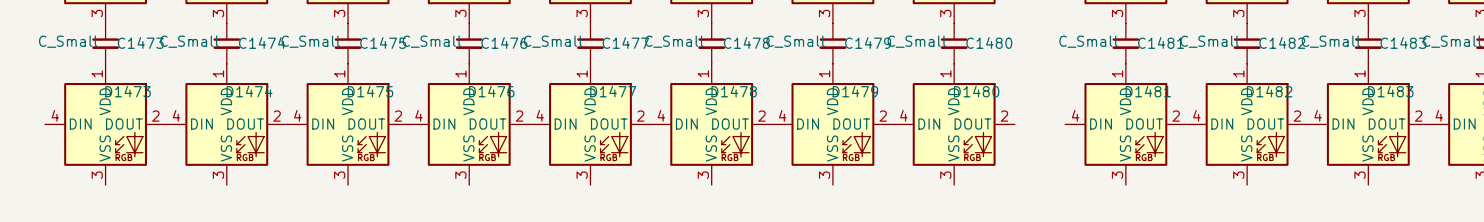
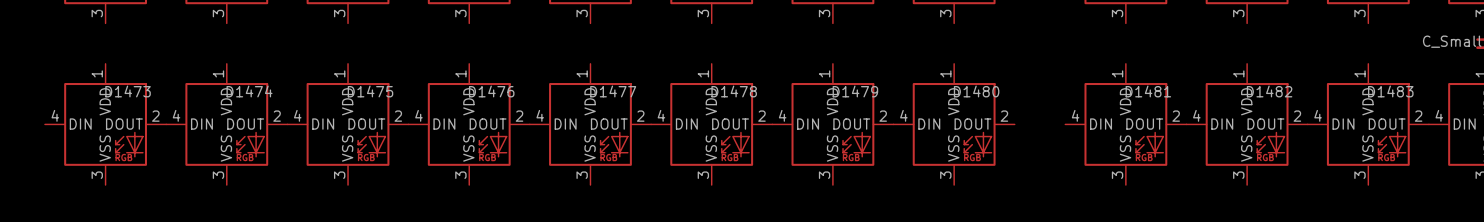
C1473: C_Small (105, 43) -> none
C1474: C_Small (226, 43) -> none
C1475: C_Small (348, 43) -> none
C1476: C_Small (469, 43) -> none
C1477: C_Small (590, 43) -> none
C1478: C_Small (711, 43) -> none
C1479: C_Small (832, 43) -> none
C1480: C_Small (954, 43) -> none
C1481: C_Small (1125, 43) -> none
C1482: C_Small (1247, 43) -> none
C1483: C_Small (1368, 43) -> none

